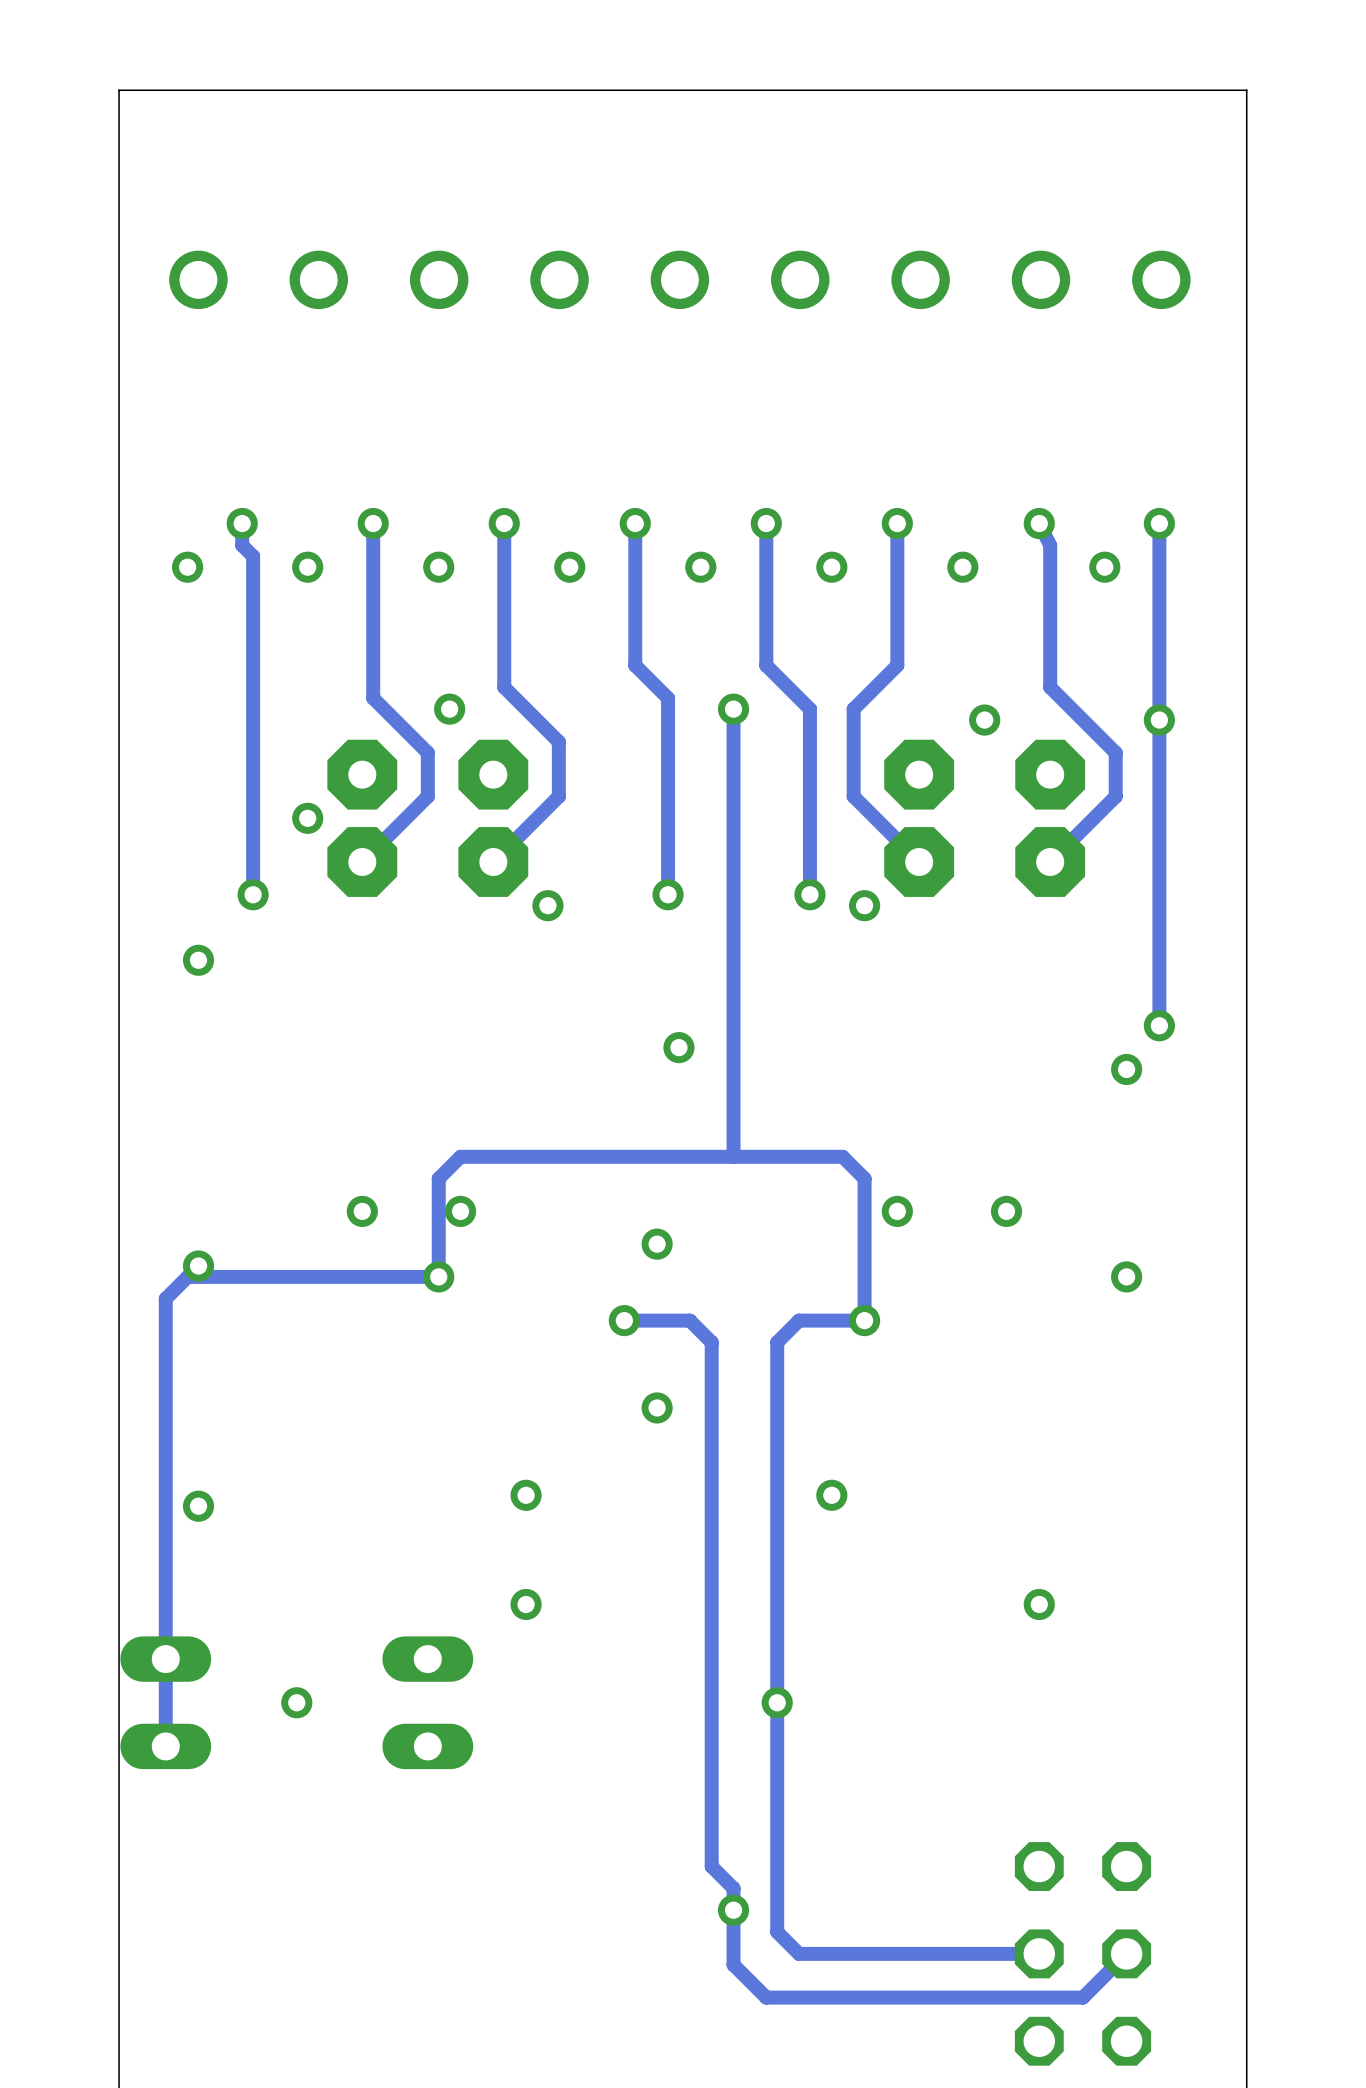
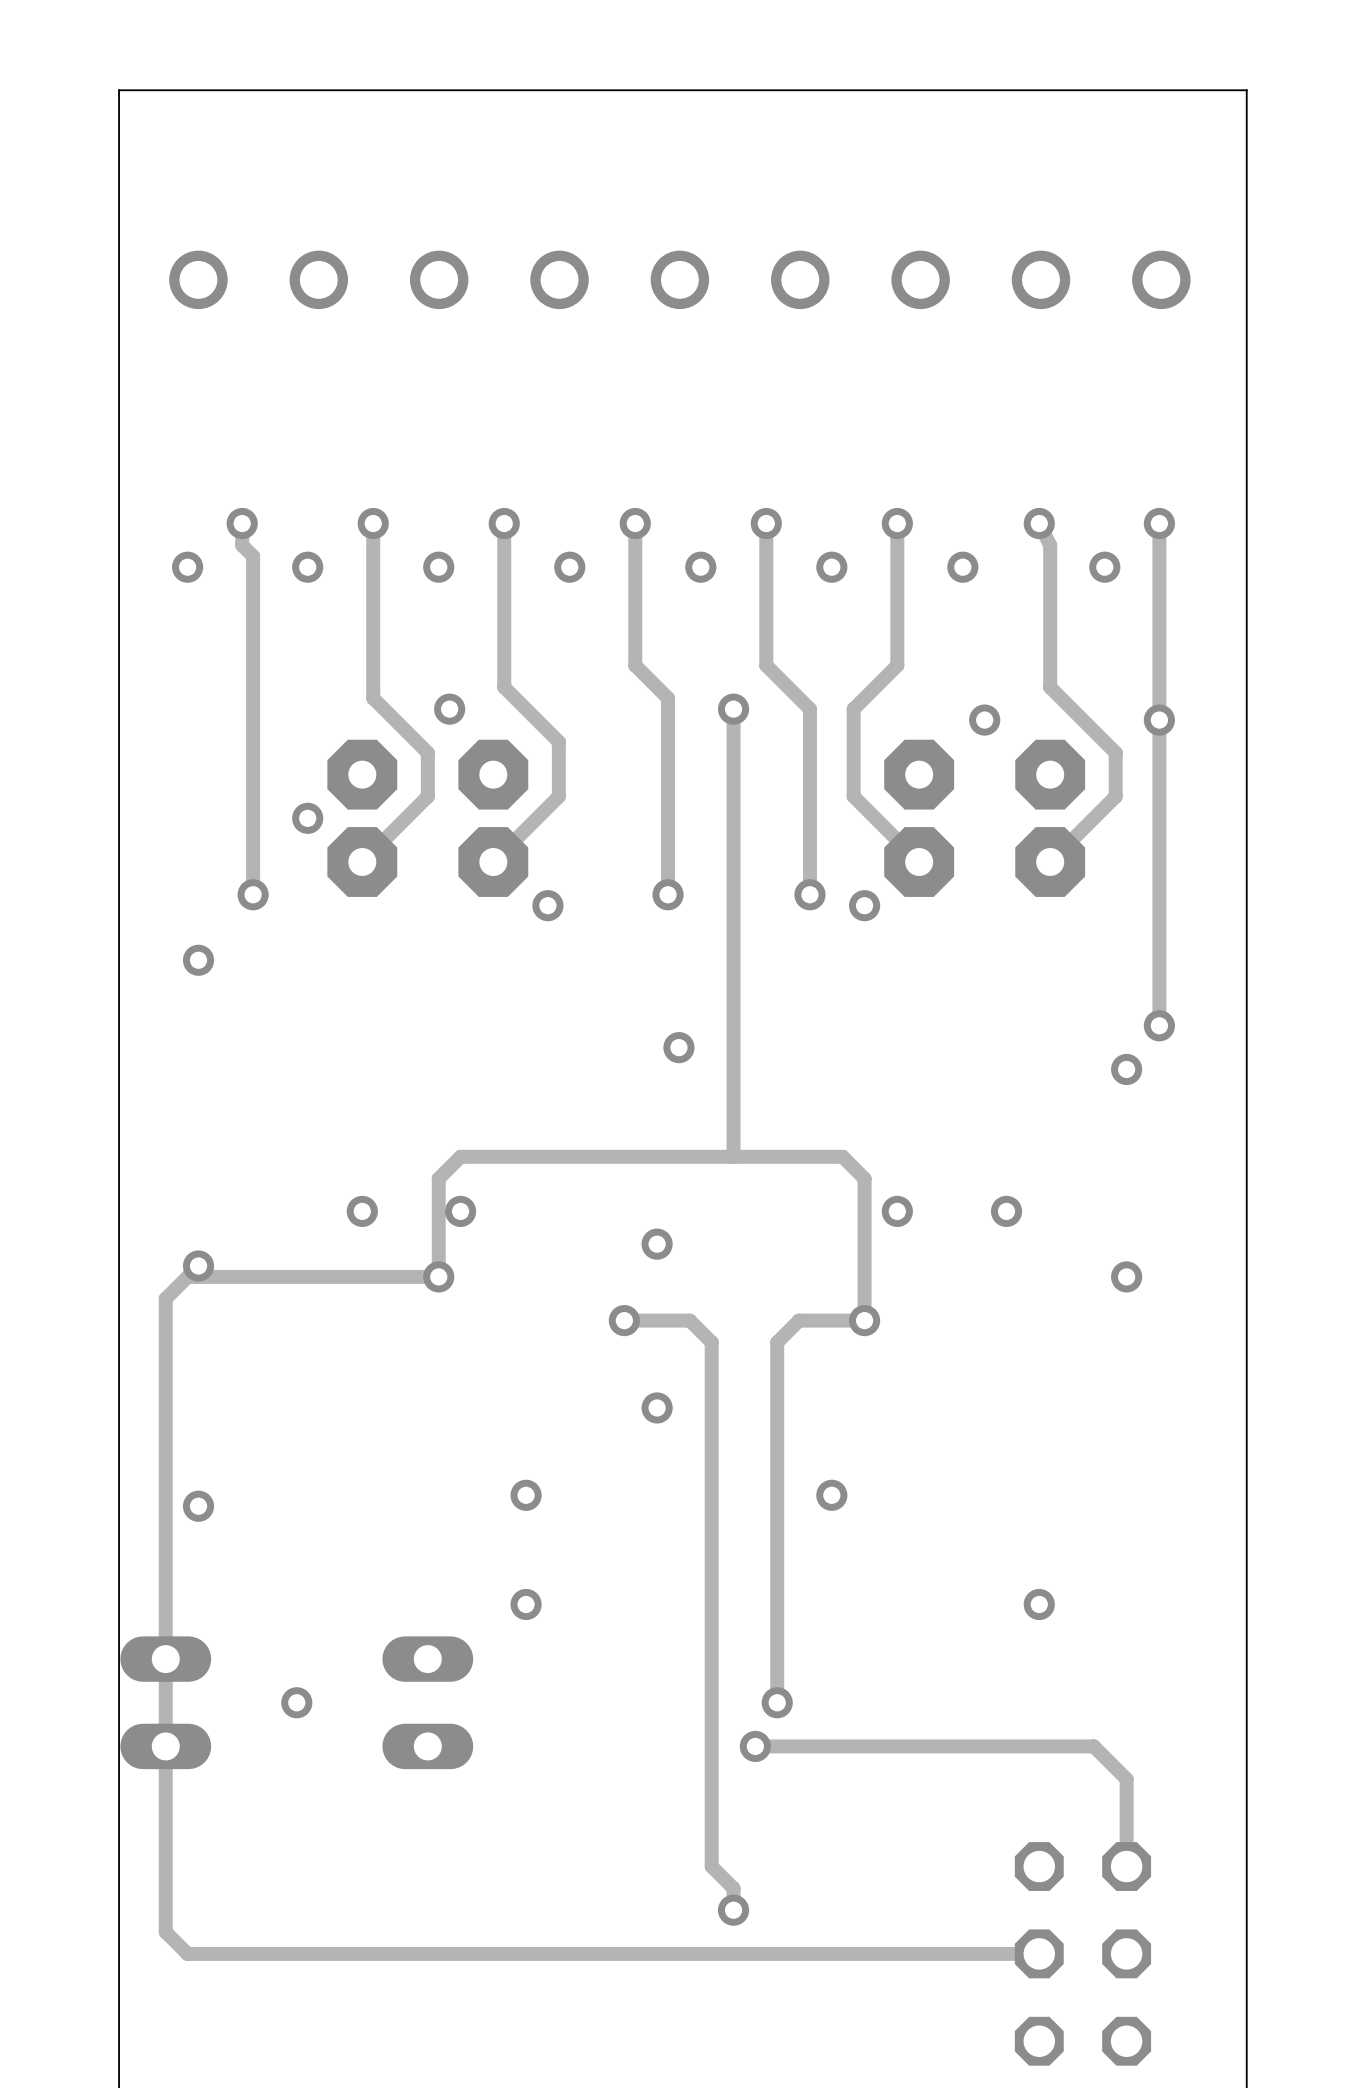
track: (777, 1702) (777, 1932) (799, 1953) -> (165, 1746) (165, 1932) (187, 1953) (799, 1953)
track: none -> (755, 1746) (1093, 1746) (1126, 1779) (1126, 1866)
via: none -> (755, 1746)
track: (733, 1910) (733, 1964) (766, 1997) (1082, 1997) (1126, 1953) -> none

